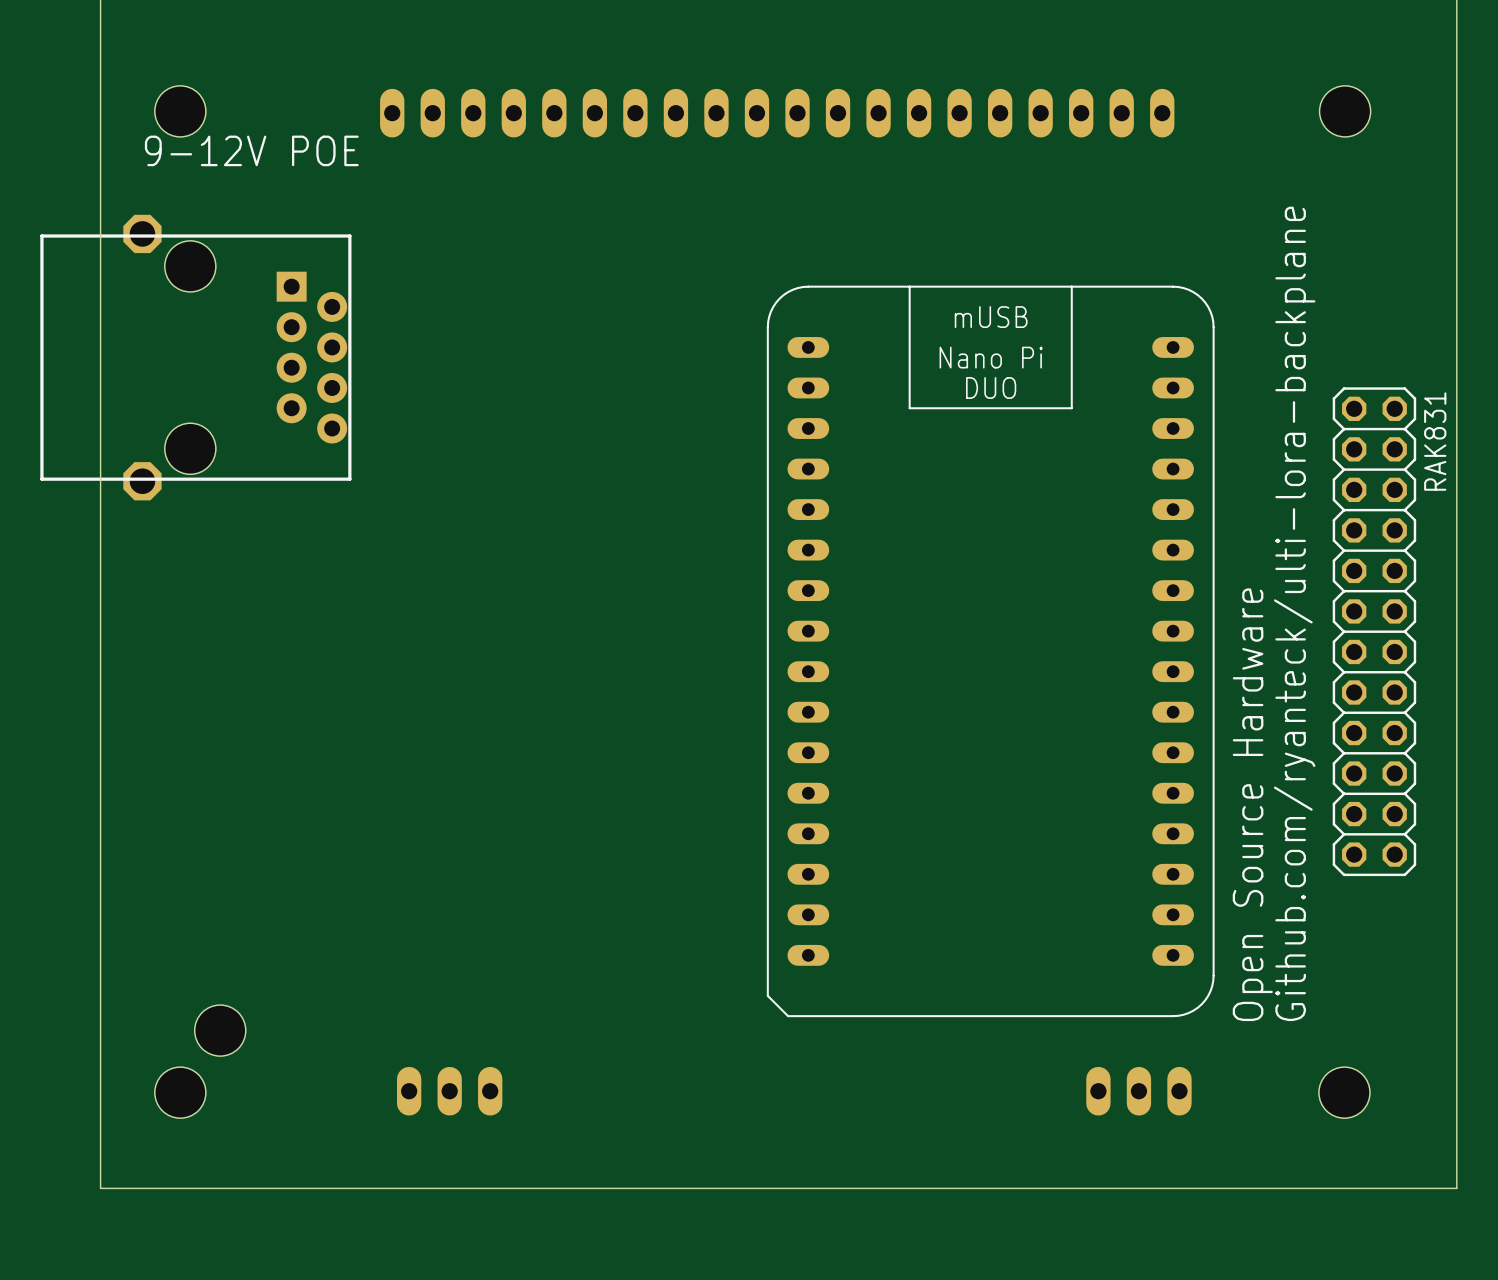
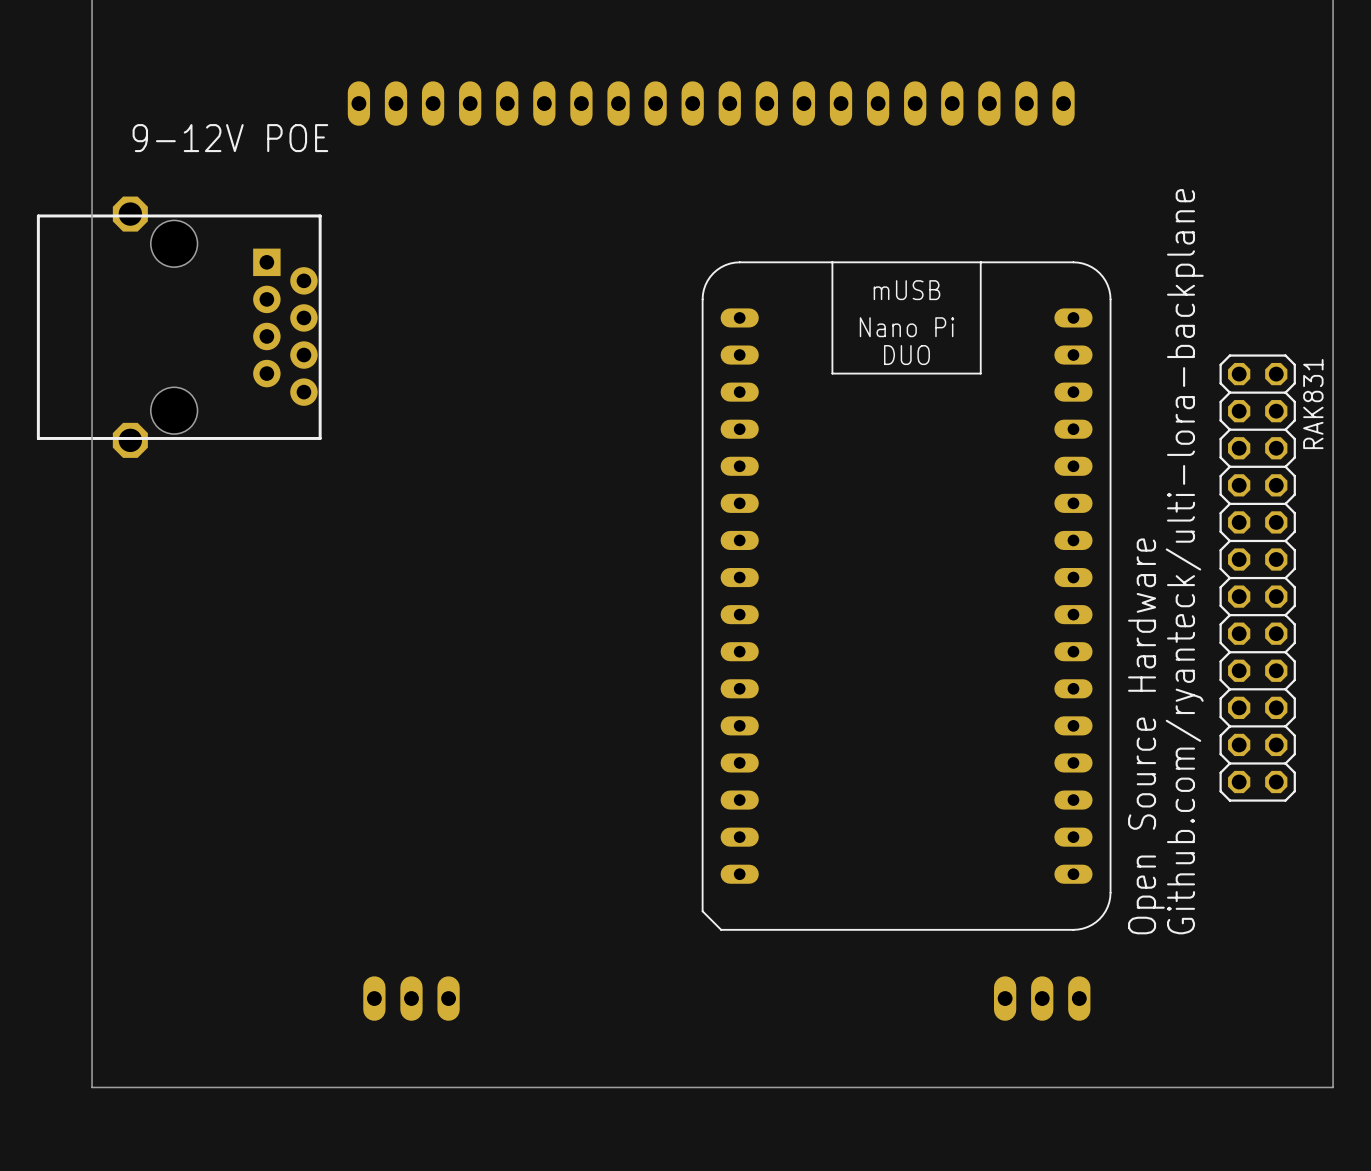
hole: (180, 111) -> none
hole: (1345, 111) -> none
hole: (220, 1030) -> none
hole: (180, 1092) -> none
hole: (1344, 1092) -> none

